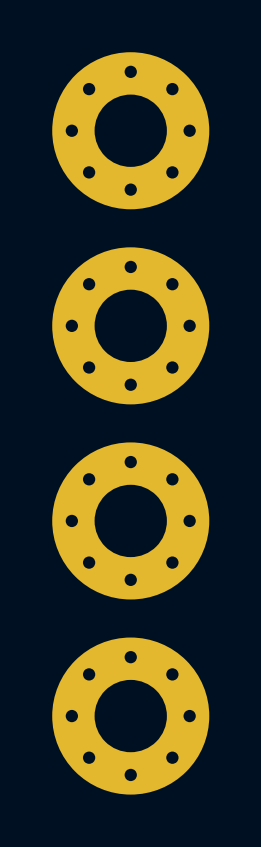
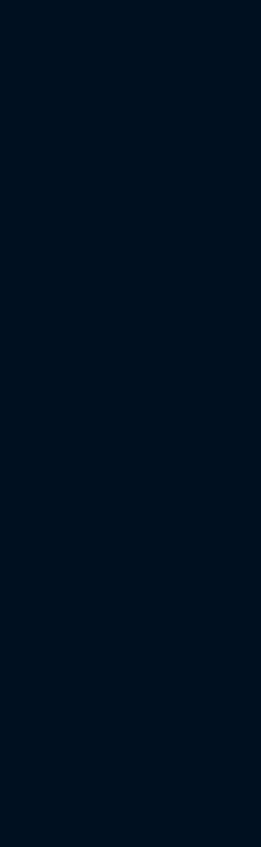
part: (130, 130) -> none
part: (130, 325) -> none
part: (130, 520) -> none
part: (130, 716) -> none

